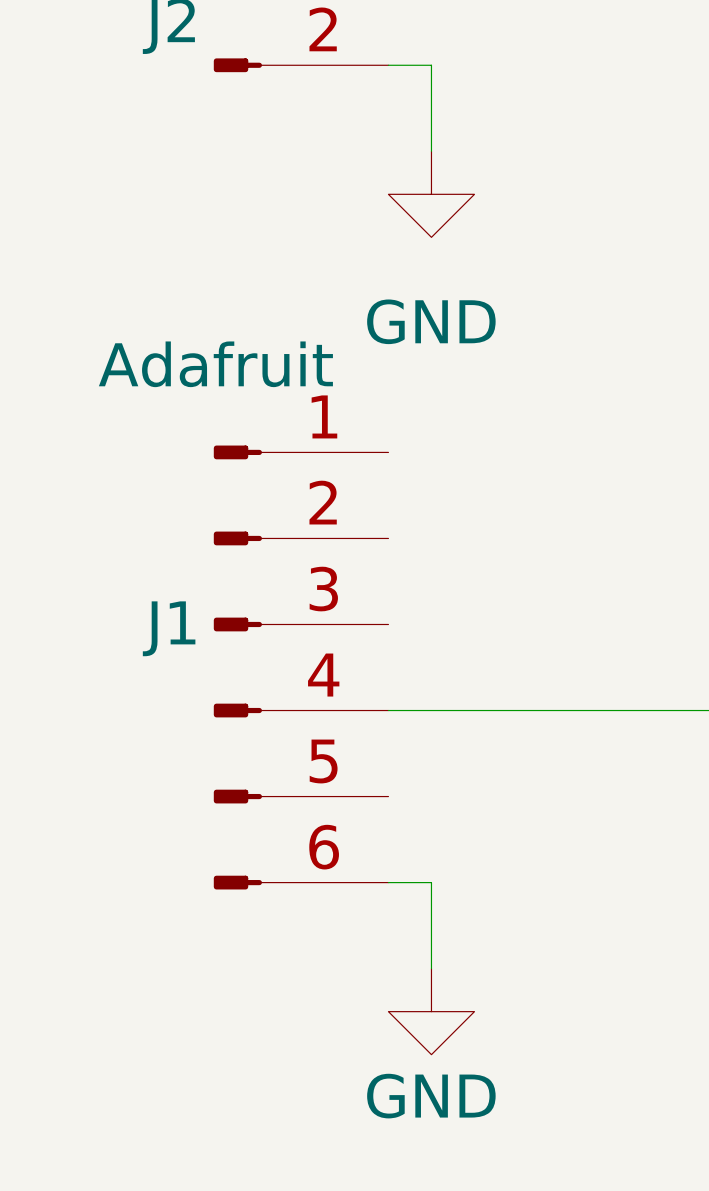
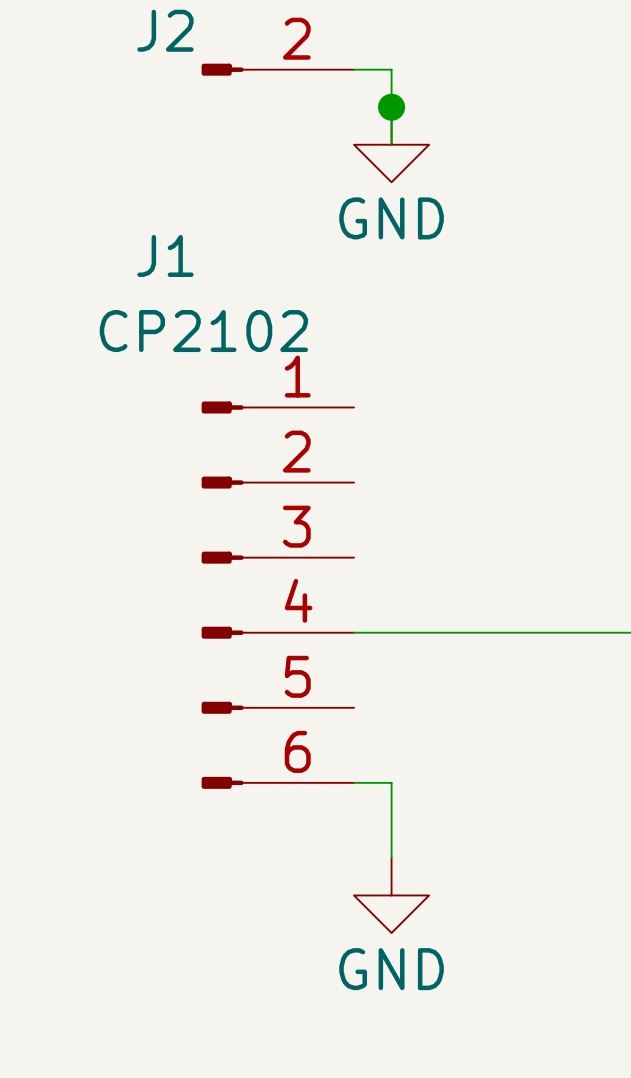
junction: none -> (391, 107)
power symbol position: GND (431, 194) -> GND (391, 144)
power symbol text position: GND (431, 321) -> GND (391, 218)
J1 value: Adafruit (215, 364) -> CP2102 (203, 331)
J1 name position: J1 (169, 628) -> J1 (165, 255)

